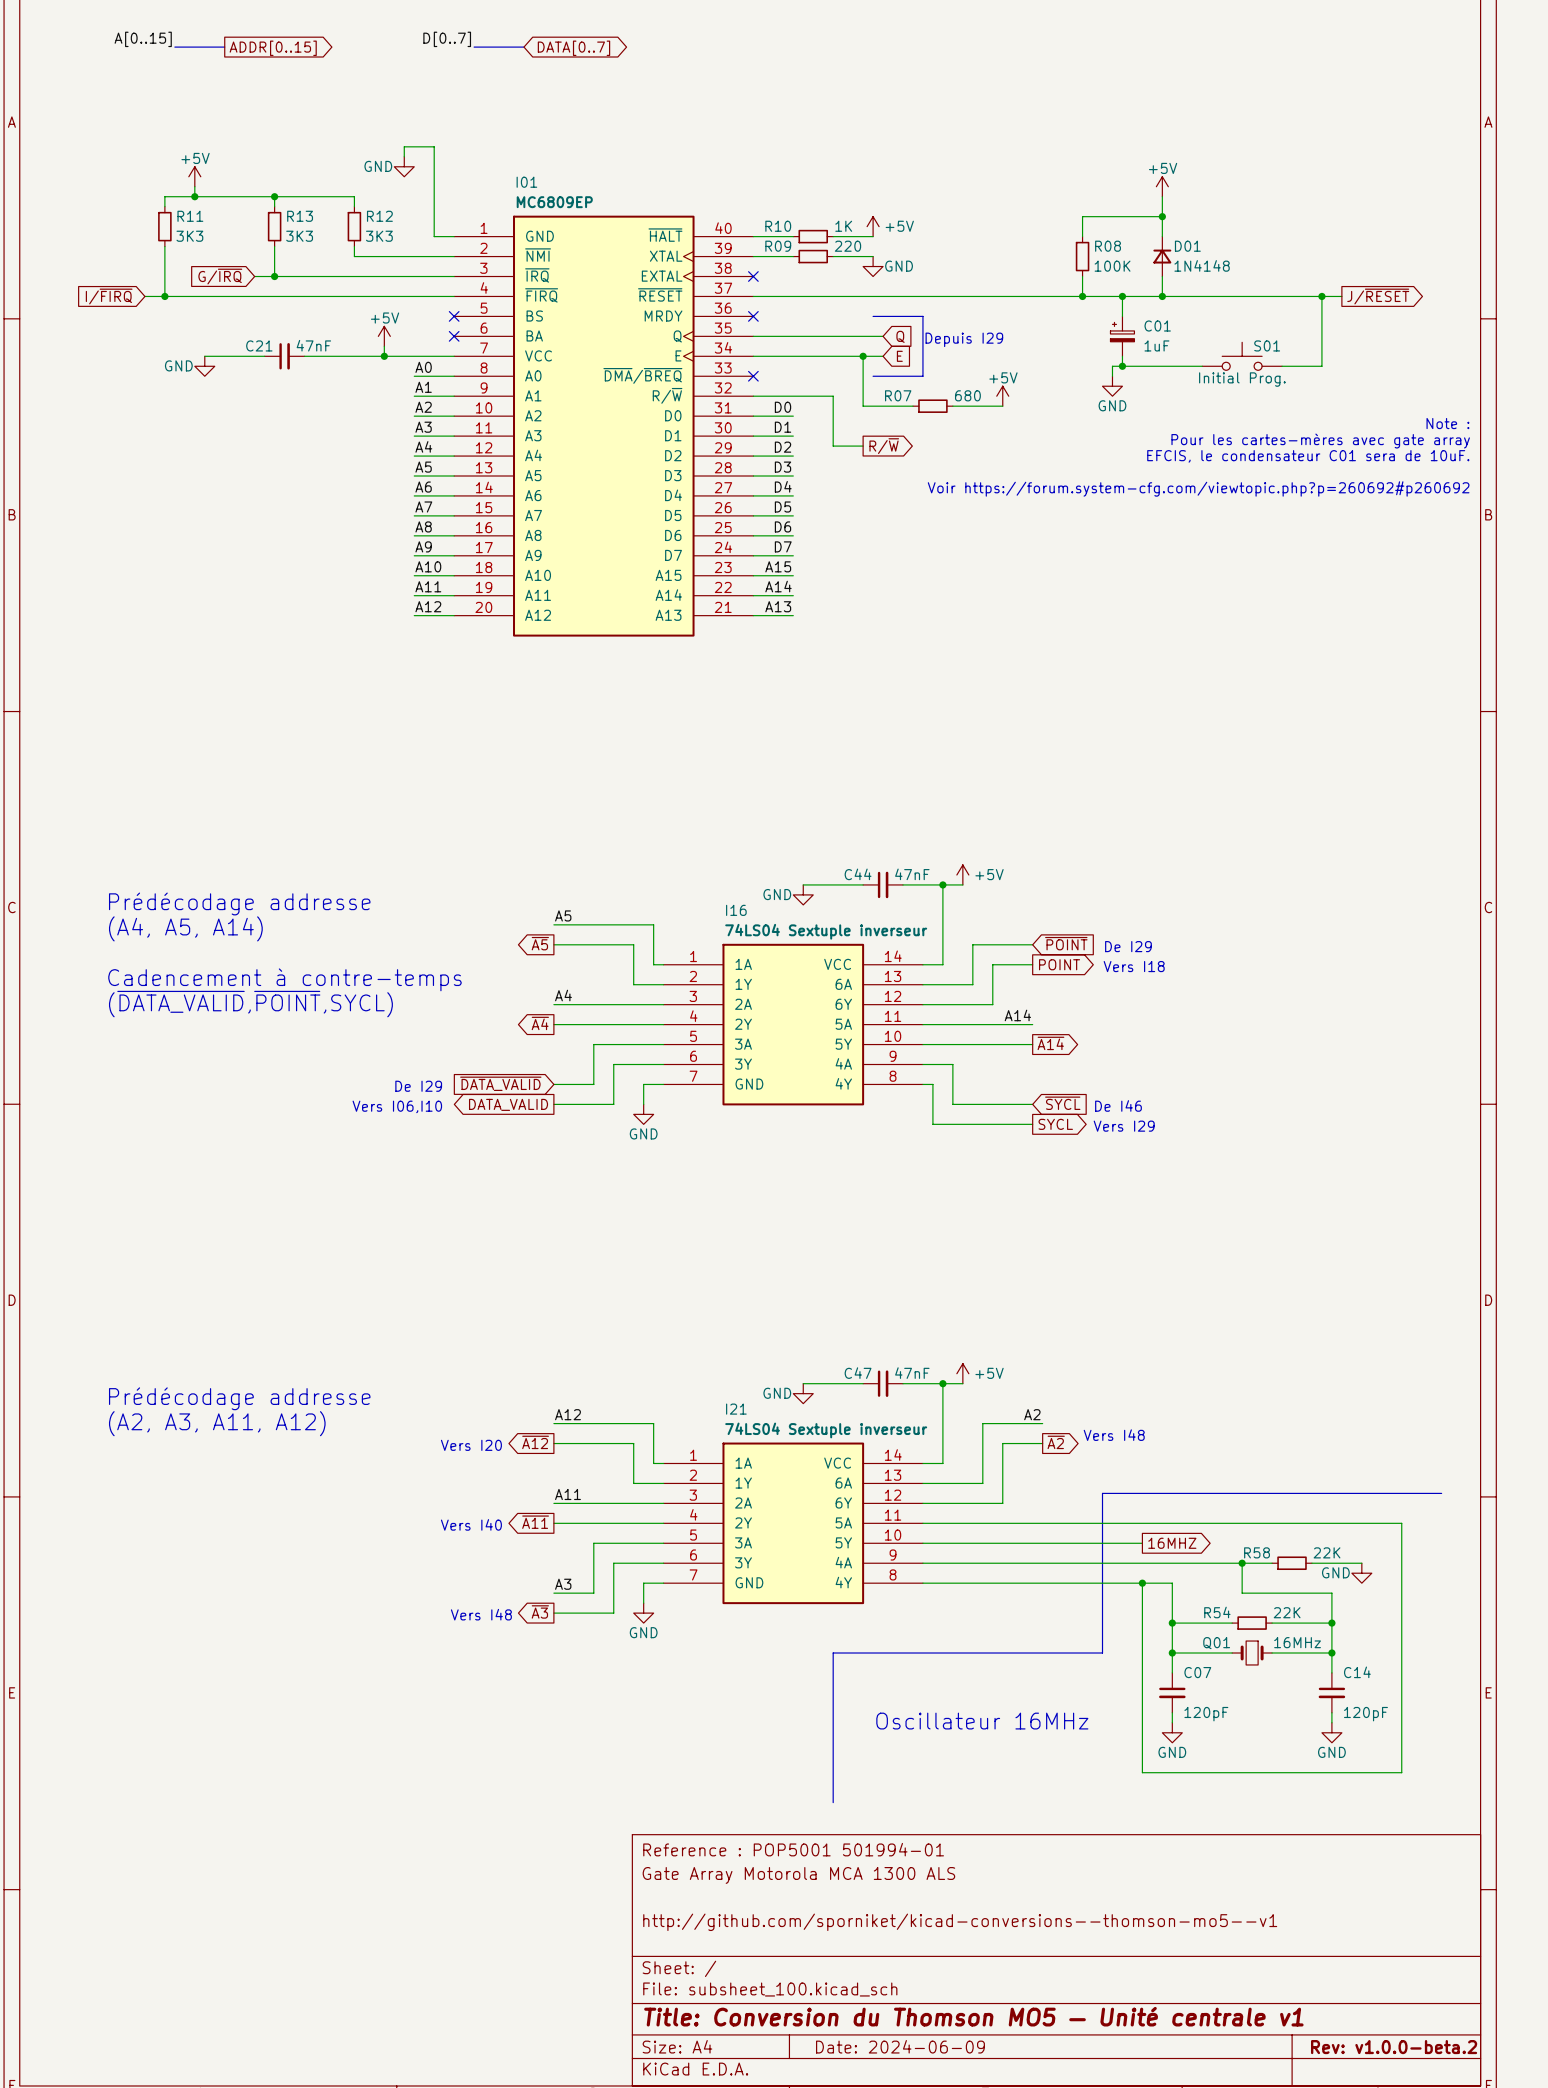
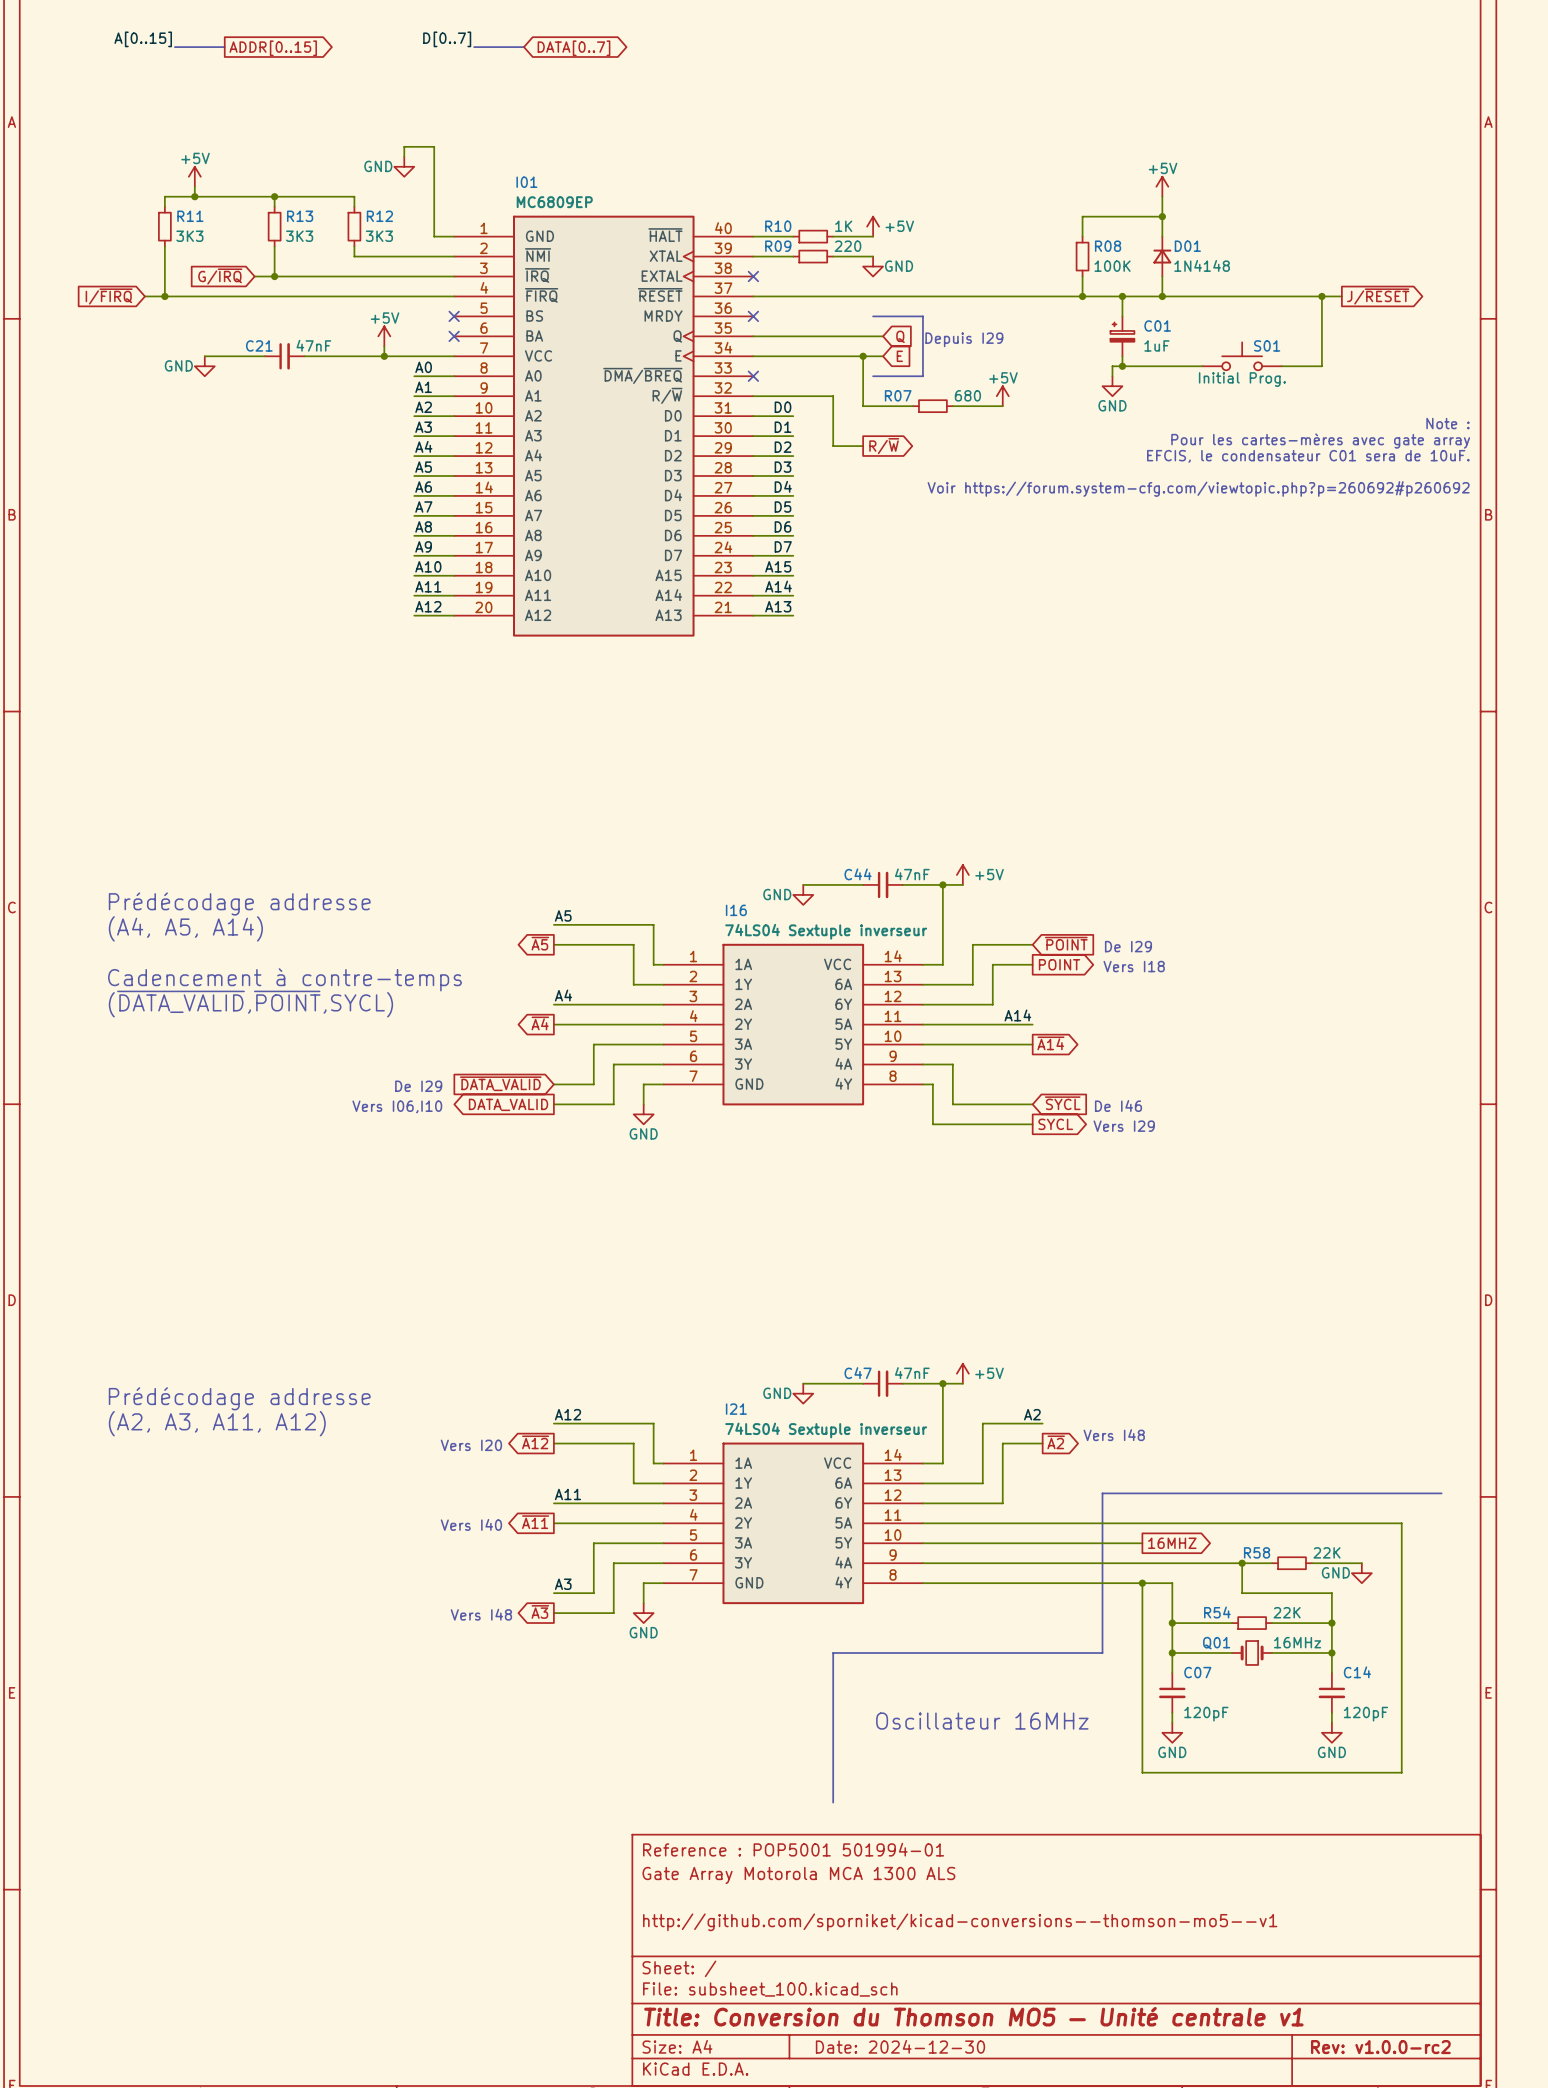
title block: Date: 2024-06-09 (900, 2046) -> Date: 2024-12-30 (900, 2046)
title block: Rev: v1.0.0-beta.2 (1394, 2047) -> Rev: v1.0.0-rc2 (1380, 2047)

